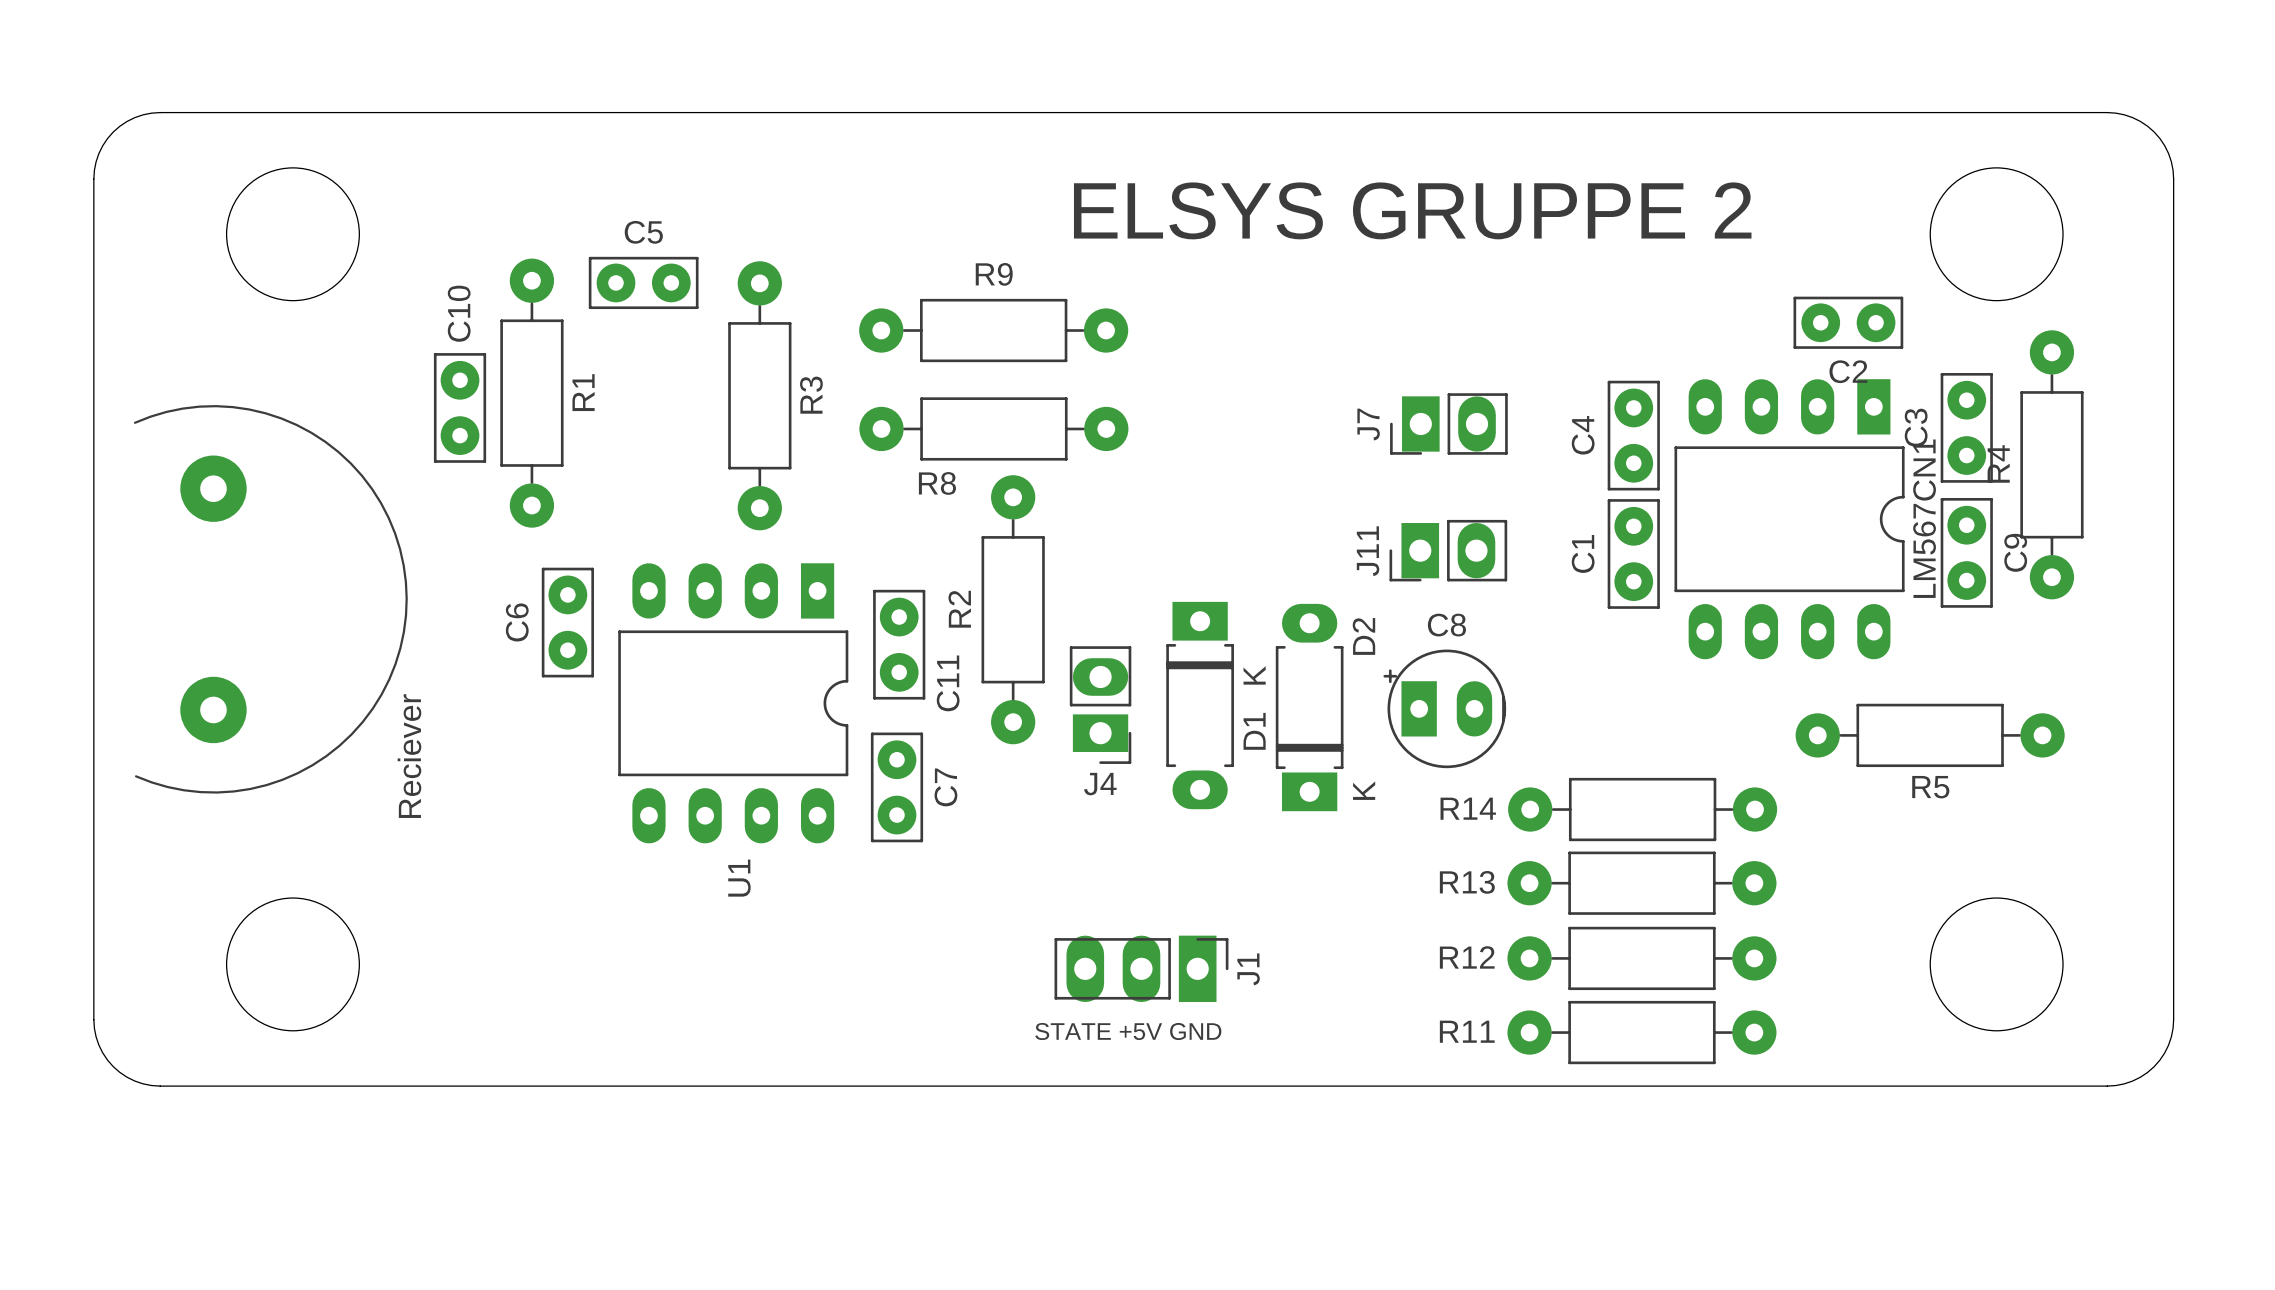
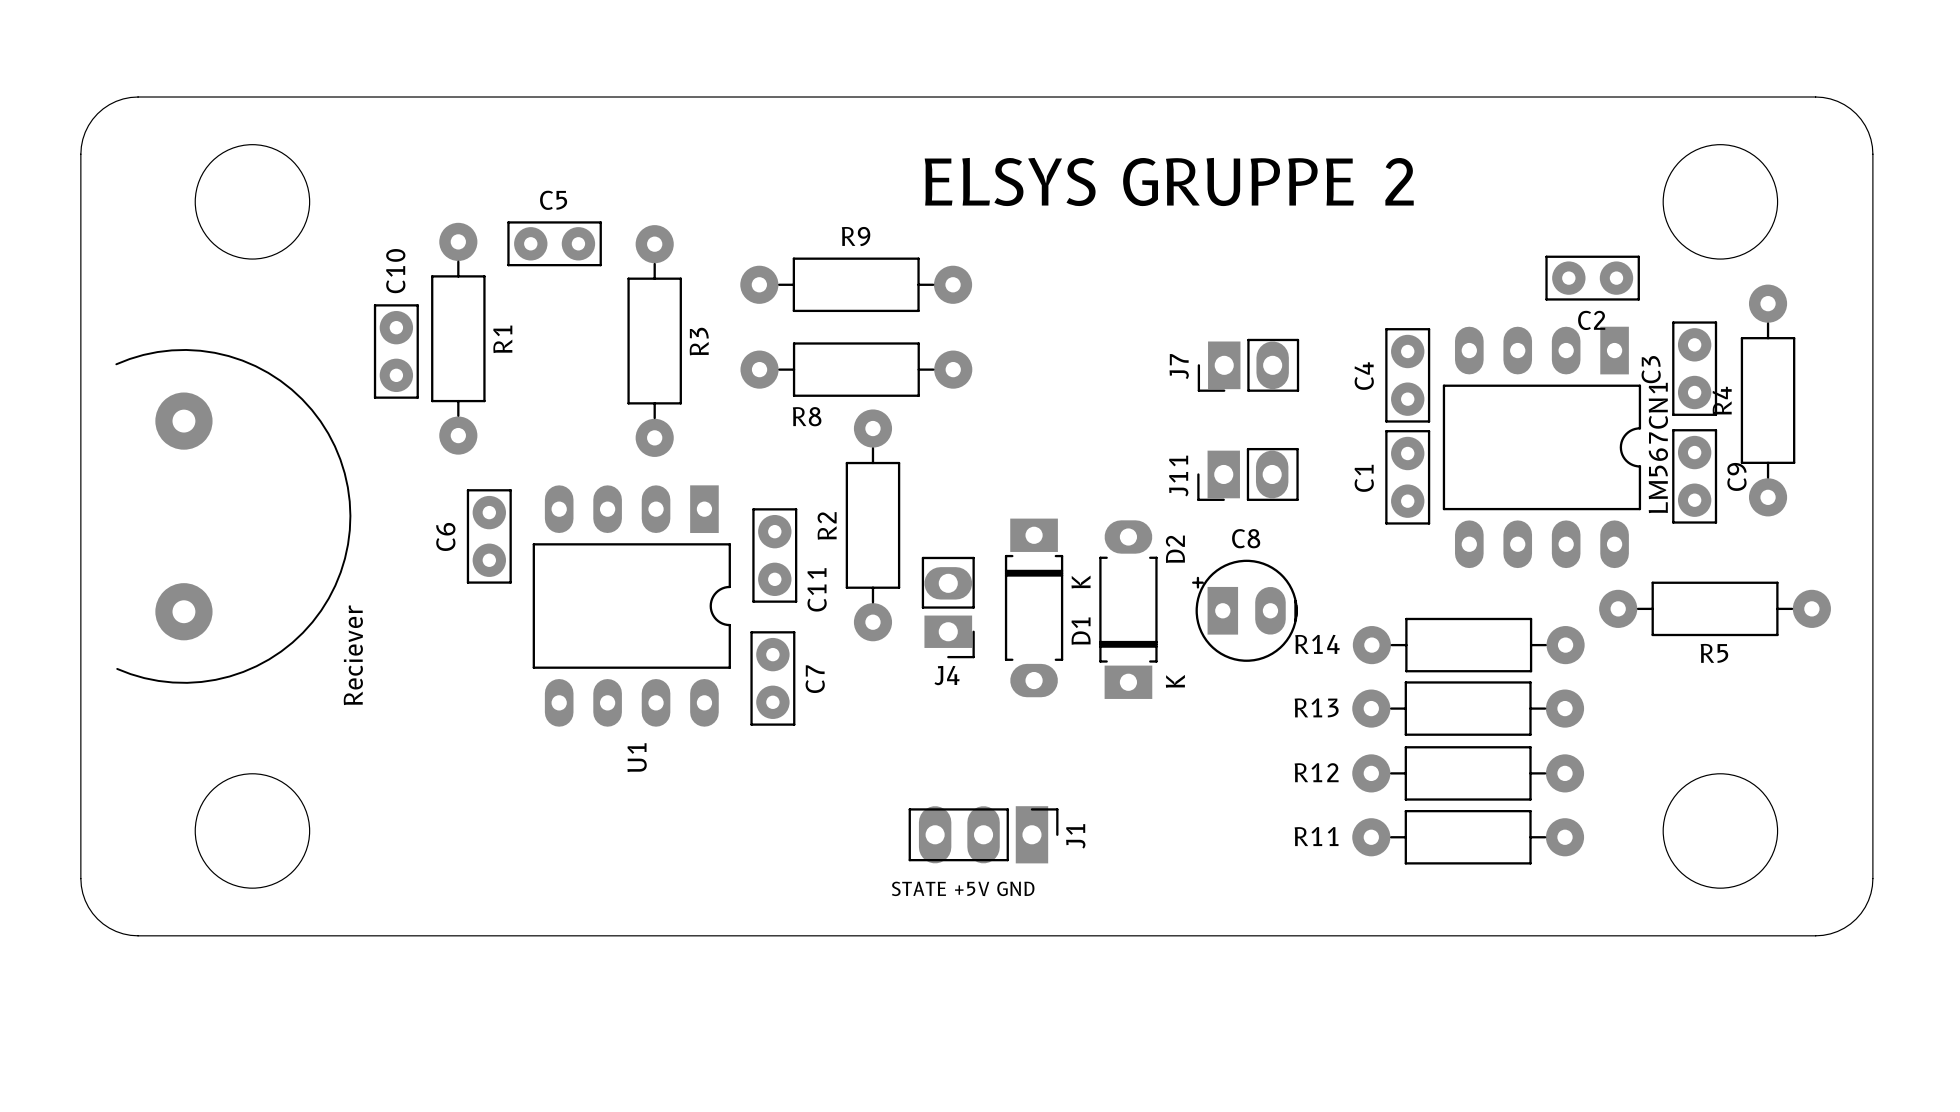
R5 position: (1930, 735) -> (1715, 608)
R14 position: (1642, 809) -> (1468, 645)
R13 position: (1641, 883) -> (1468, 708)
R12 position: (1641, 958) -> (1468, 773)
R11 position: (1641, 1032) -> (1468, 837)

